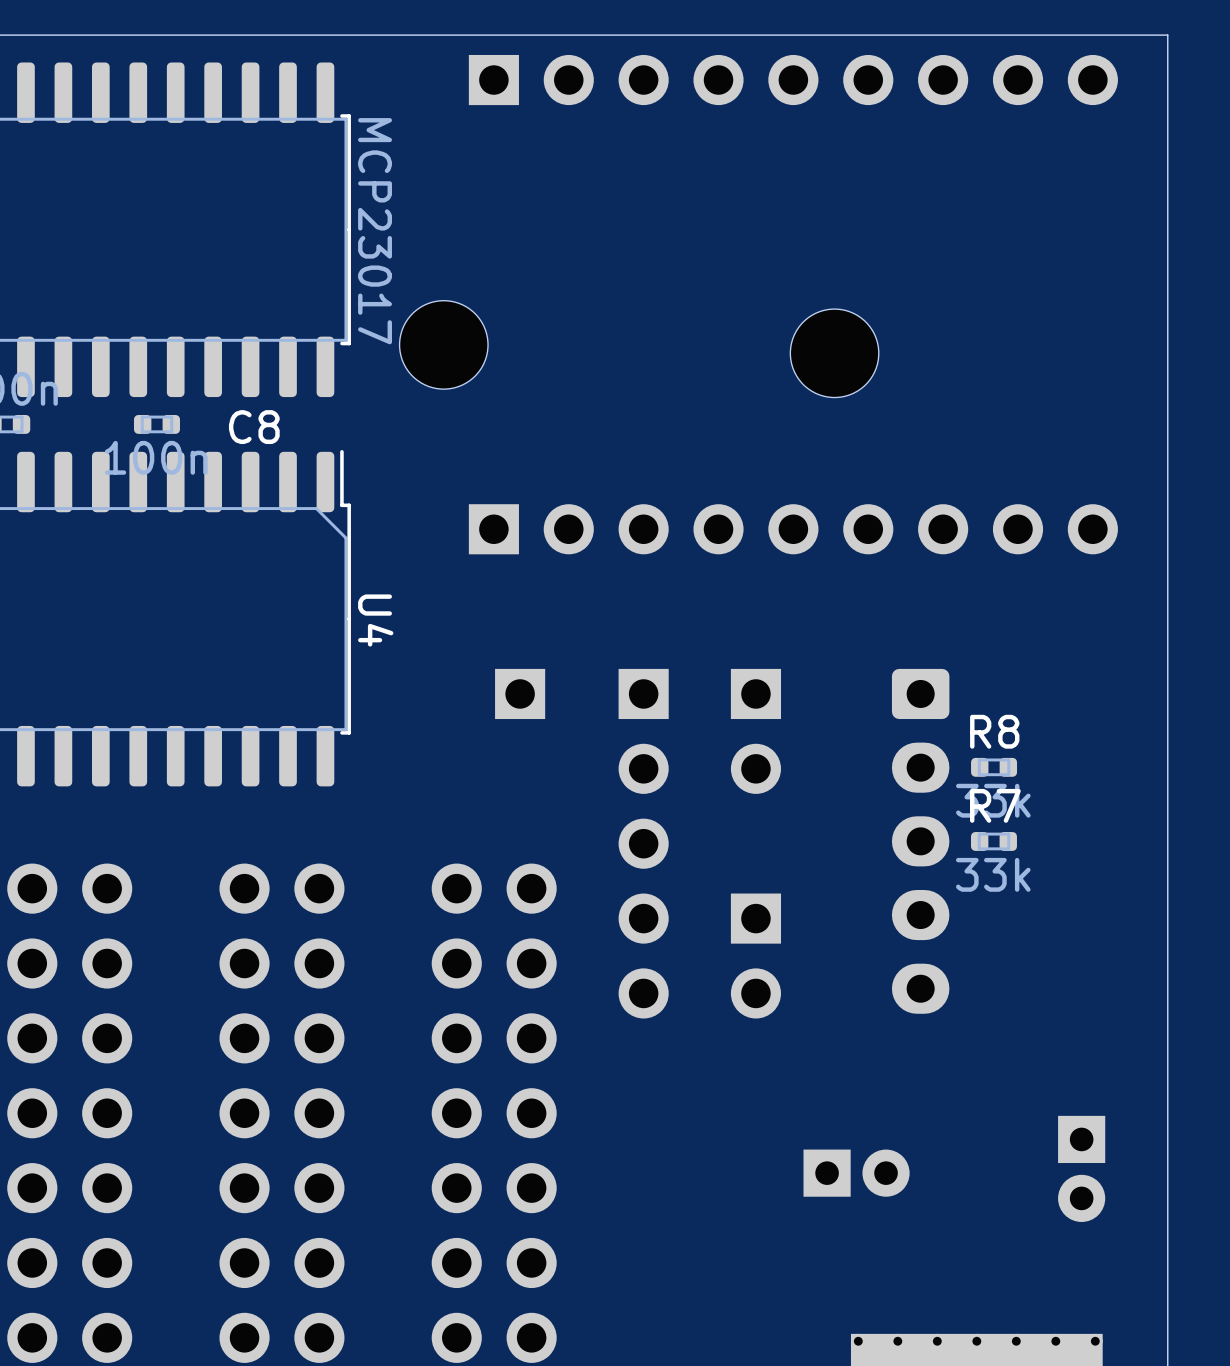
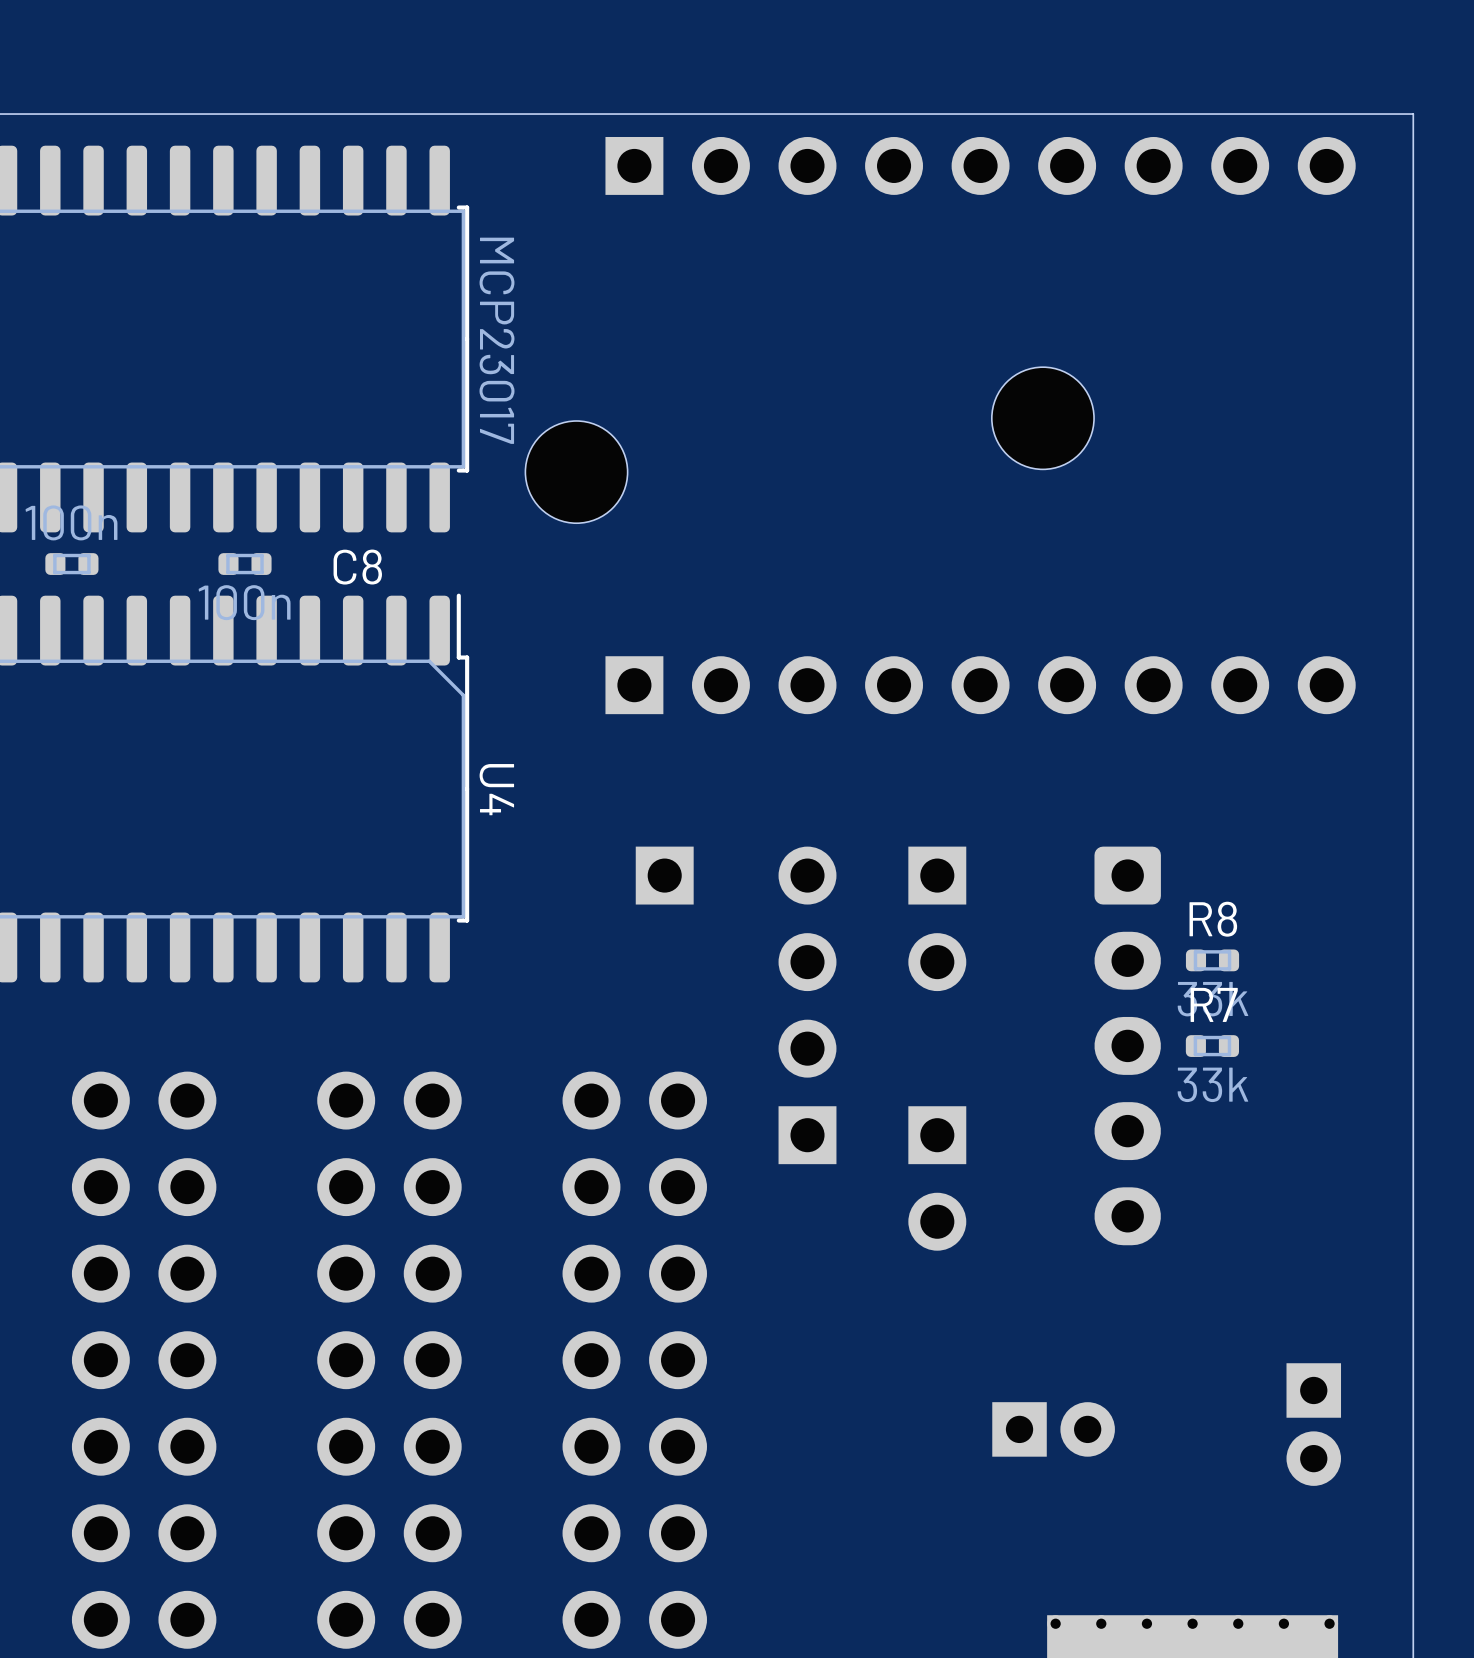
part position: (834, 353) -> (1042, 418)
part: none -> (807, 1005)
part: (643, 843) -> none

